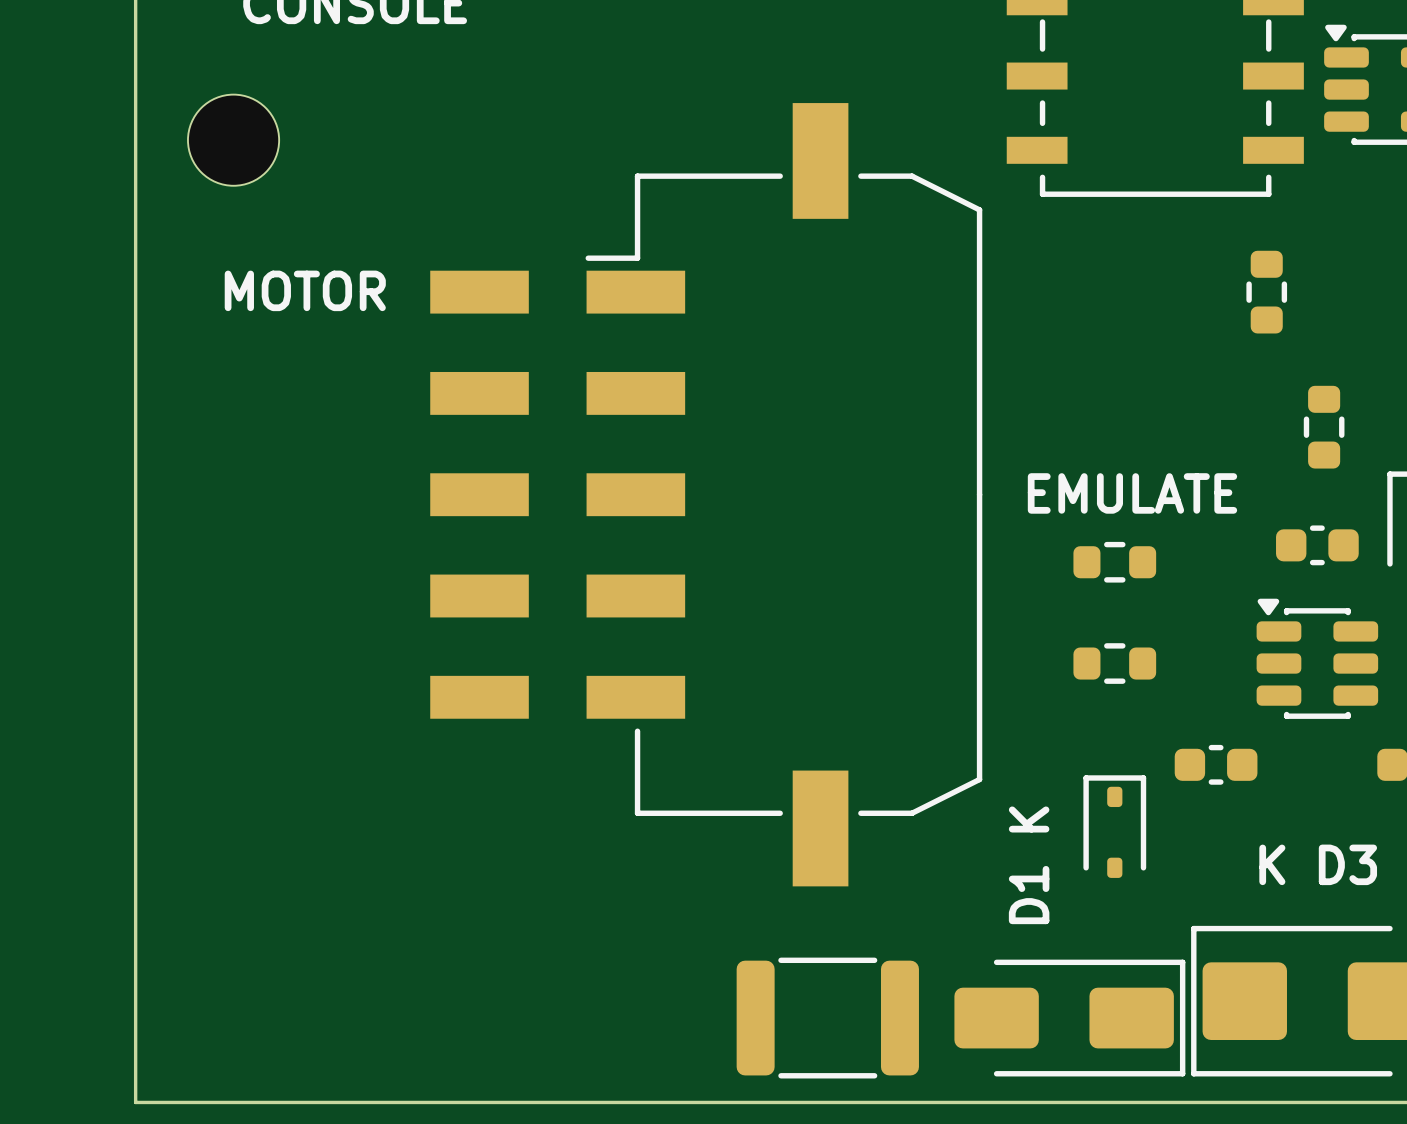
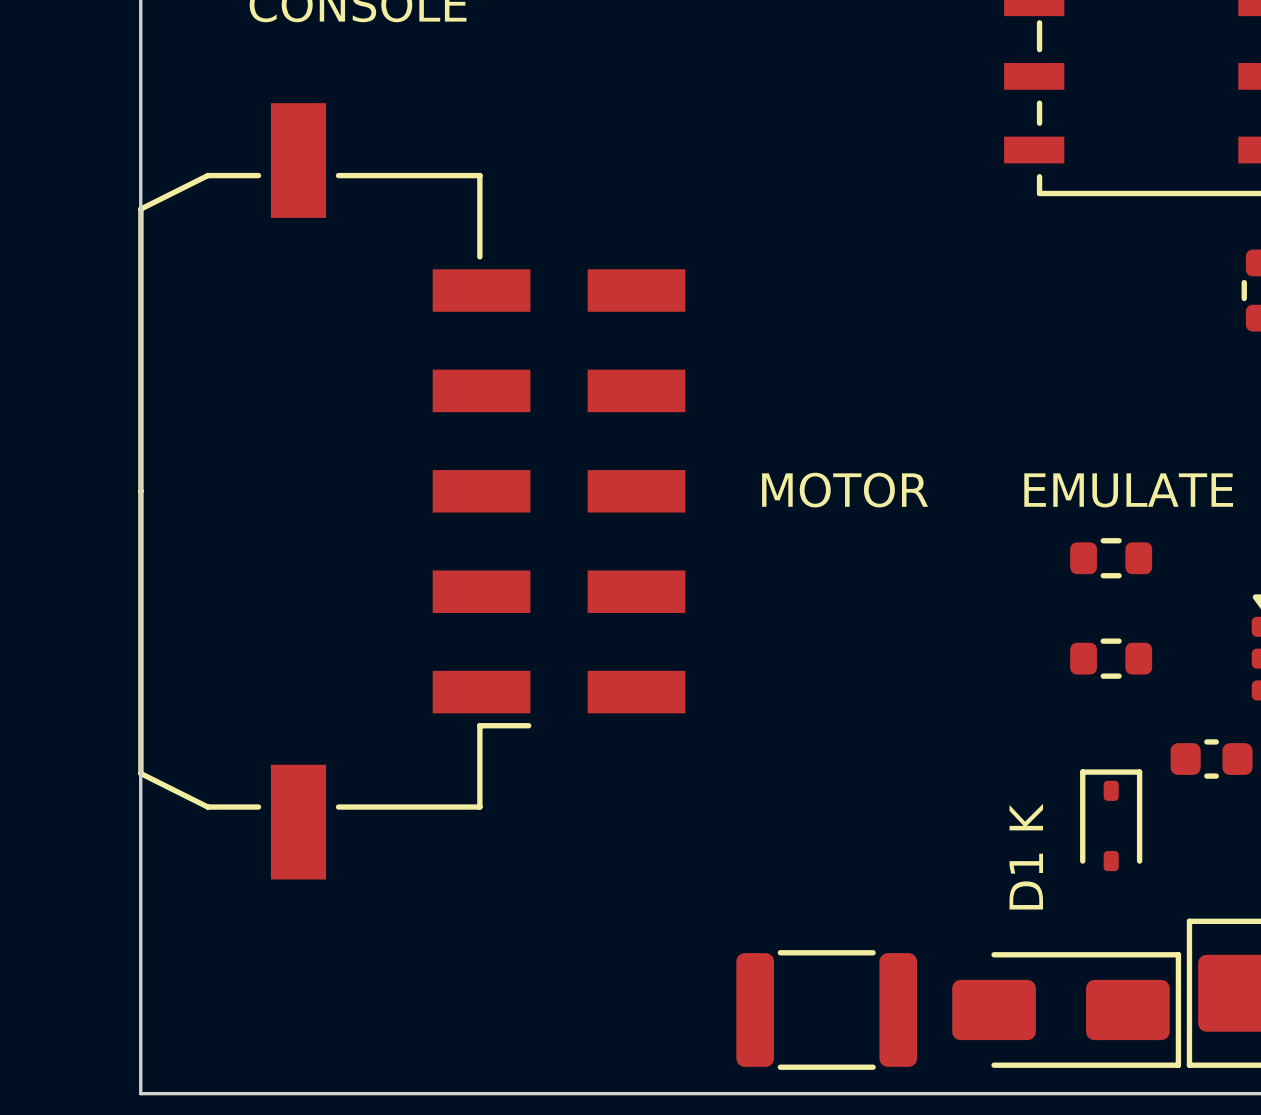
part: (233, 140) -> none
text position: MOTOR (305, 290) -> MOTOR (845, 490)
part rotation: 0° (706, 494) -> 180° (411, 491)

